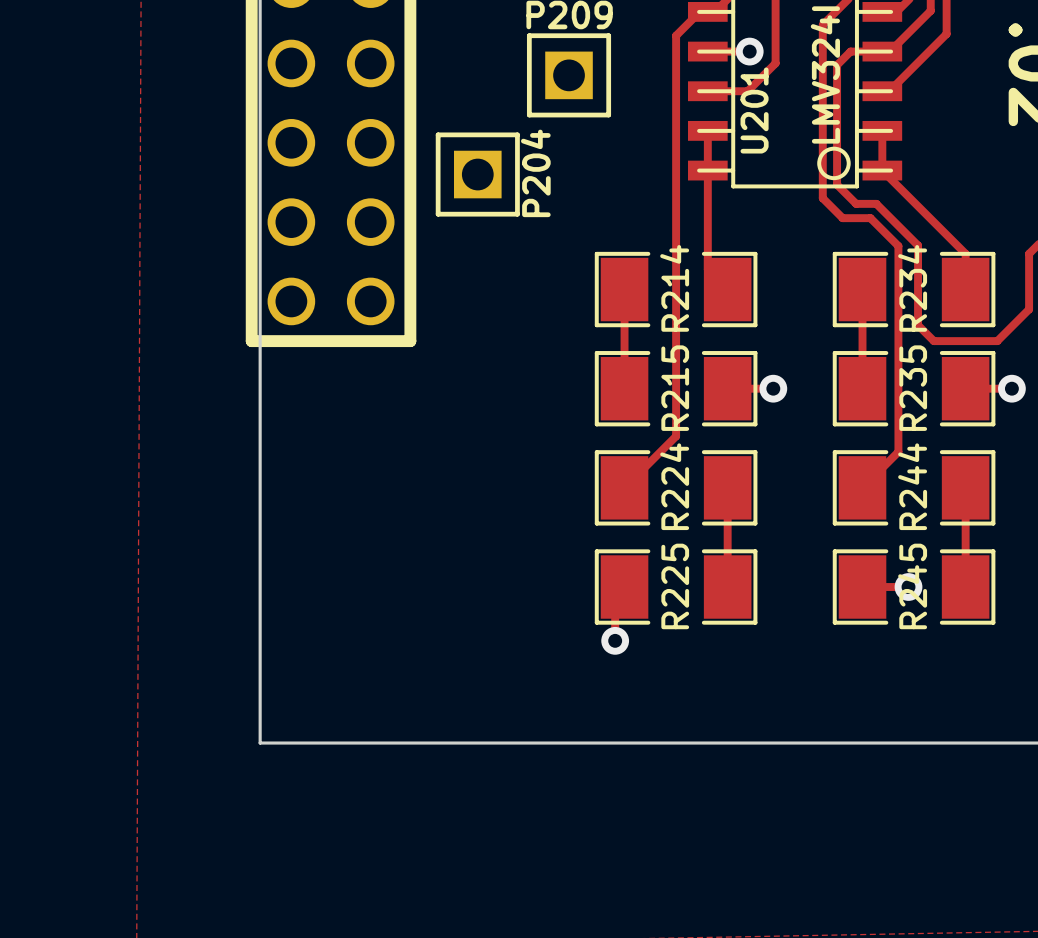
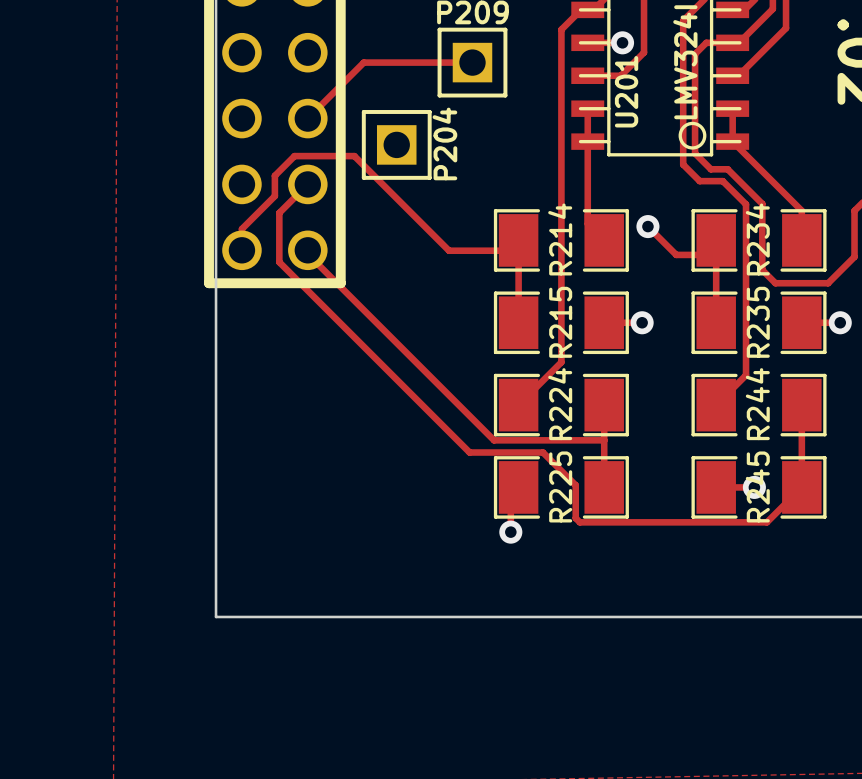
track: none -> (472, 62) (363, 62) (307, 118)
track: none -> (307, 184) (279, 212) (279, 262) (469, 452) (542, 452) (575, 485) (575, 518) (579, 522) (766, 522) (801, 487)
track: none -> (647, 226) (676, 254) (716, 254)
via: none -> (647, 226)
track: none -> (241, 250) (241, 229) (274, 196) (274, 175) (294, 156) (354, 156) (449, 250) (518, 250)
track: none -> (307, 250) (307, 254) (494, 440) (604, 440)

